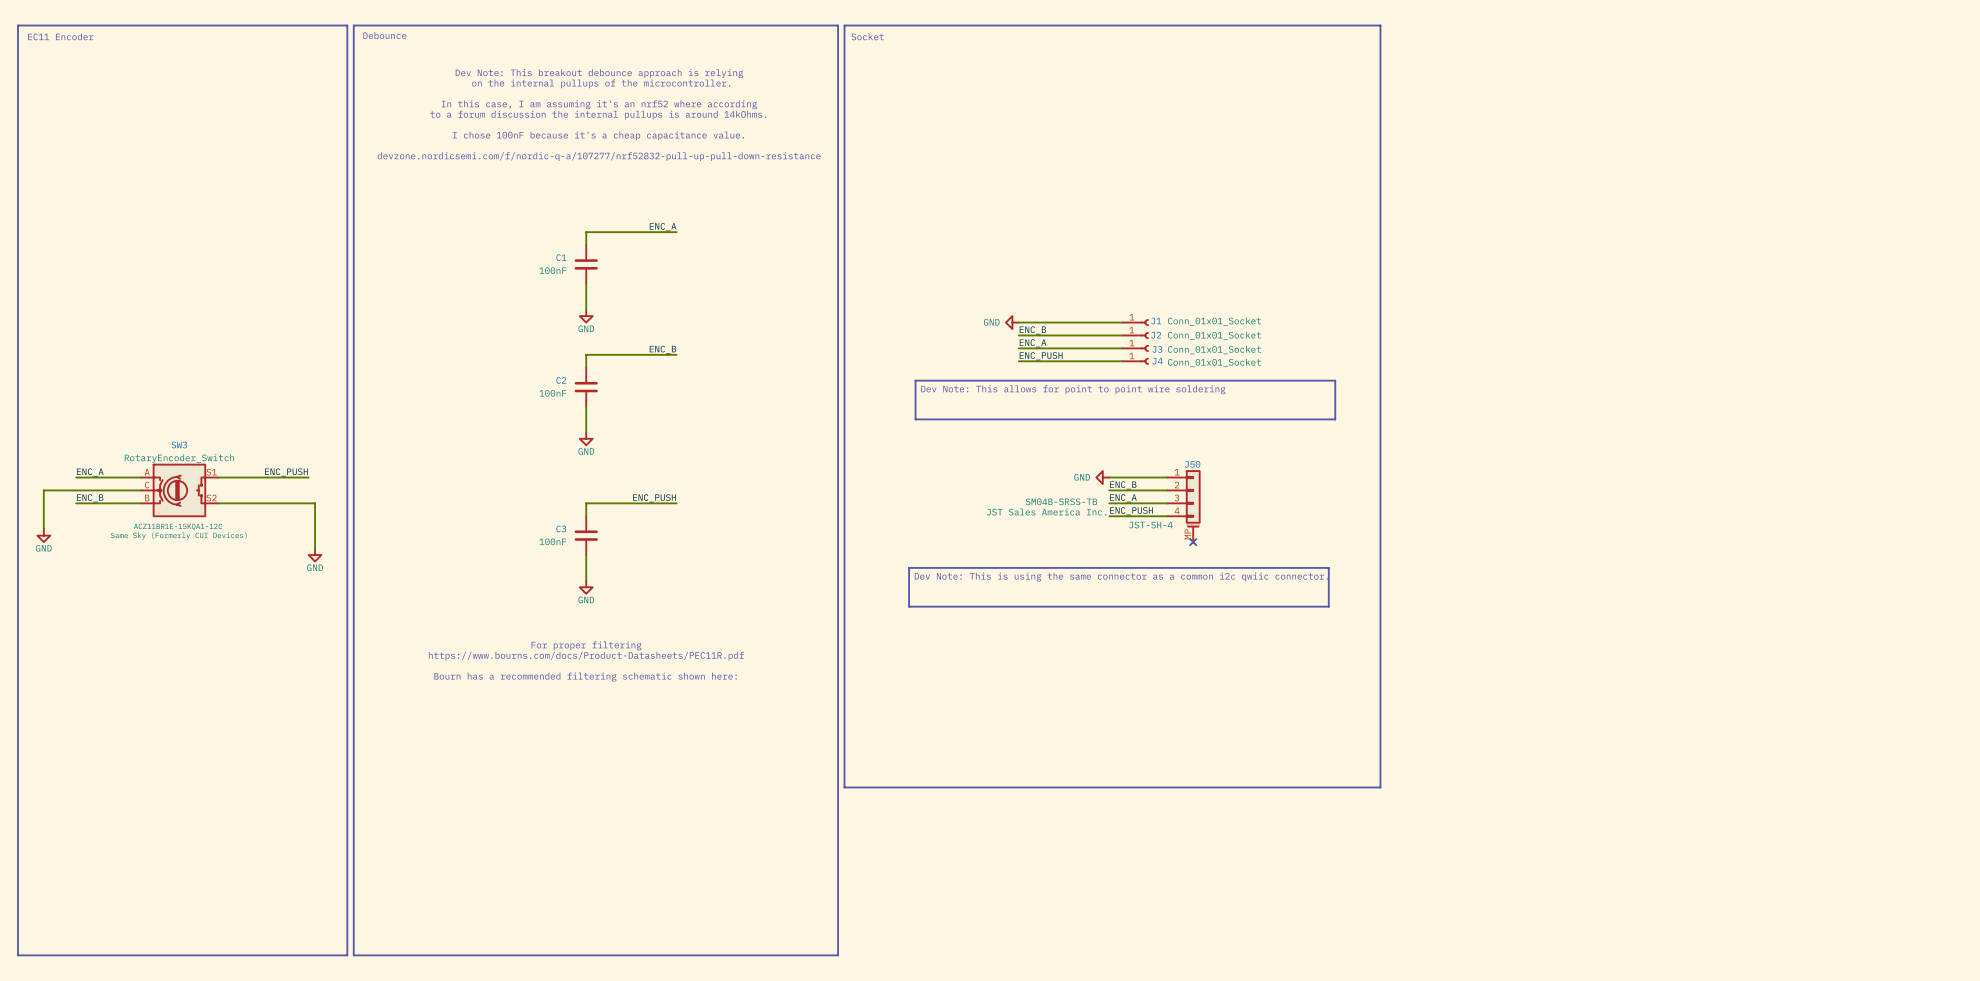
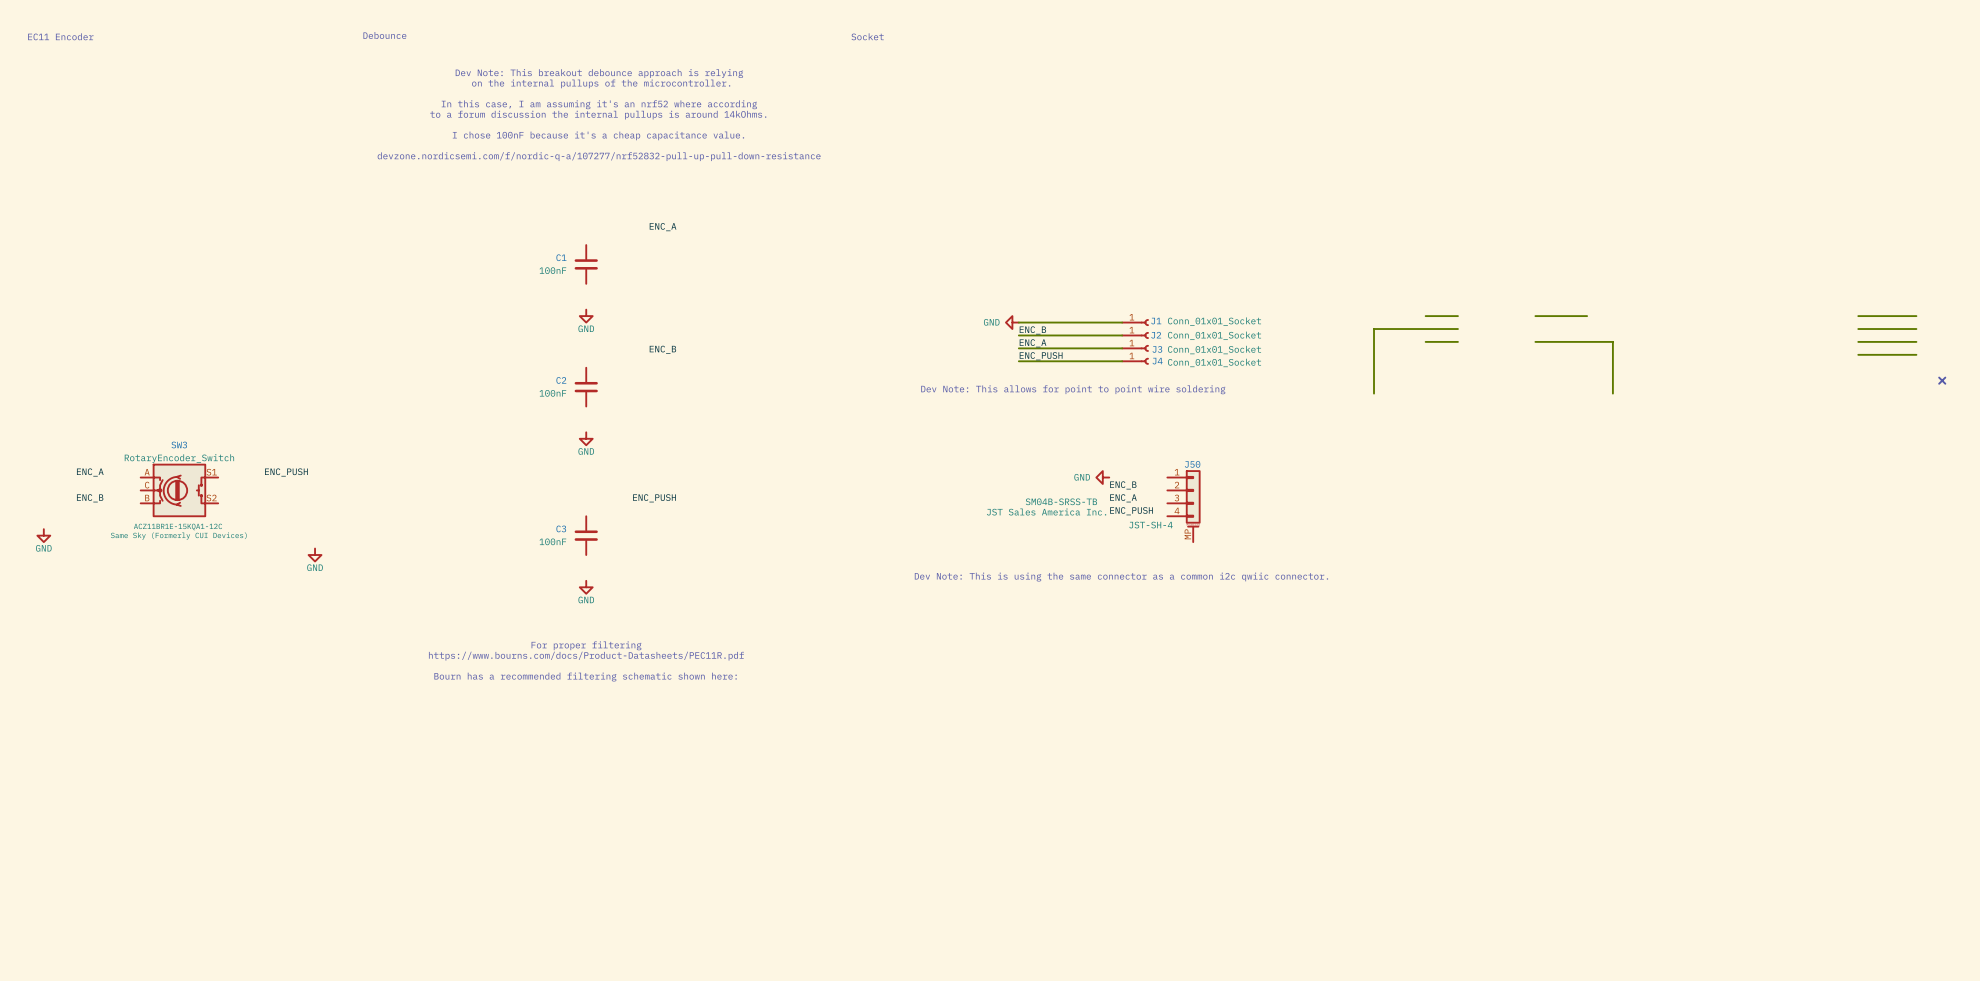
line: (18, 25) (347, 25) (347, 955) (18, 955) (18, 25) -> none
line: (353, 25) (838, 25) (838, 955) (353, 955) (353, 25) -> none
line: (844, 25) (1380, 25) (1380, 787) (844, 787) (844, 25) -> none
wire: (676, 232) (586, 232) (586, 245) -> none
wire: (586, 283) (586, 309) -> none
wire: none -> (1425, 316) (1457, 316)
wire: none -> (1535, 316) (1587, 316)
wire: none -> (1858, 316) (1916, 316)
wire: none -> (1457, 329) (1374, 329) (1374, 393)
wire: none -> (1858, 329) (1916, 329)
wire: none -> (1425, 341) (1457, 341)
wire: none -> (1535, 341) (1612, 341) (1612, 393)
wire: none -> (1858, 341) (1916, 341)
wire: (676, 354) (586, 354) (586, 367) -> none
wire: none -> (1858, 354) (1916, 354)
line: (915, 380) (1335, 380) (1335, 419) (915, 419) (915, 380) -> none
no-connect mark: none -> (1942, 380)
wire: (586, 406) (586, 432) -> none
wire: (76, 477) (140, 477) -> none
wire: (218, 477) (308, 477) -> none
wire: (1109, 477) (1167, 477) -> none
wire: (140, 490) (43, 490) (43, 529) -> none
wire: (1109, 490) (1167, 490) -> none
wire: (76, 503) (140, 503) -> none
wire: (218, 503) (315, 503) (315, 548) -> none
wire: (676, 503) (586, 503) (586, 516) -> none
wire: (1109, 503) (1167, 503) -> none
wire: (1109, 516) (1167, 516) -> none
no-connect mark: (1193, 542) -> none
wire: (586, 555) (586, 580) -> none
line: (909, 567) (1328, 567) (1328, 606) (909, 606) (909, 567) -> none

